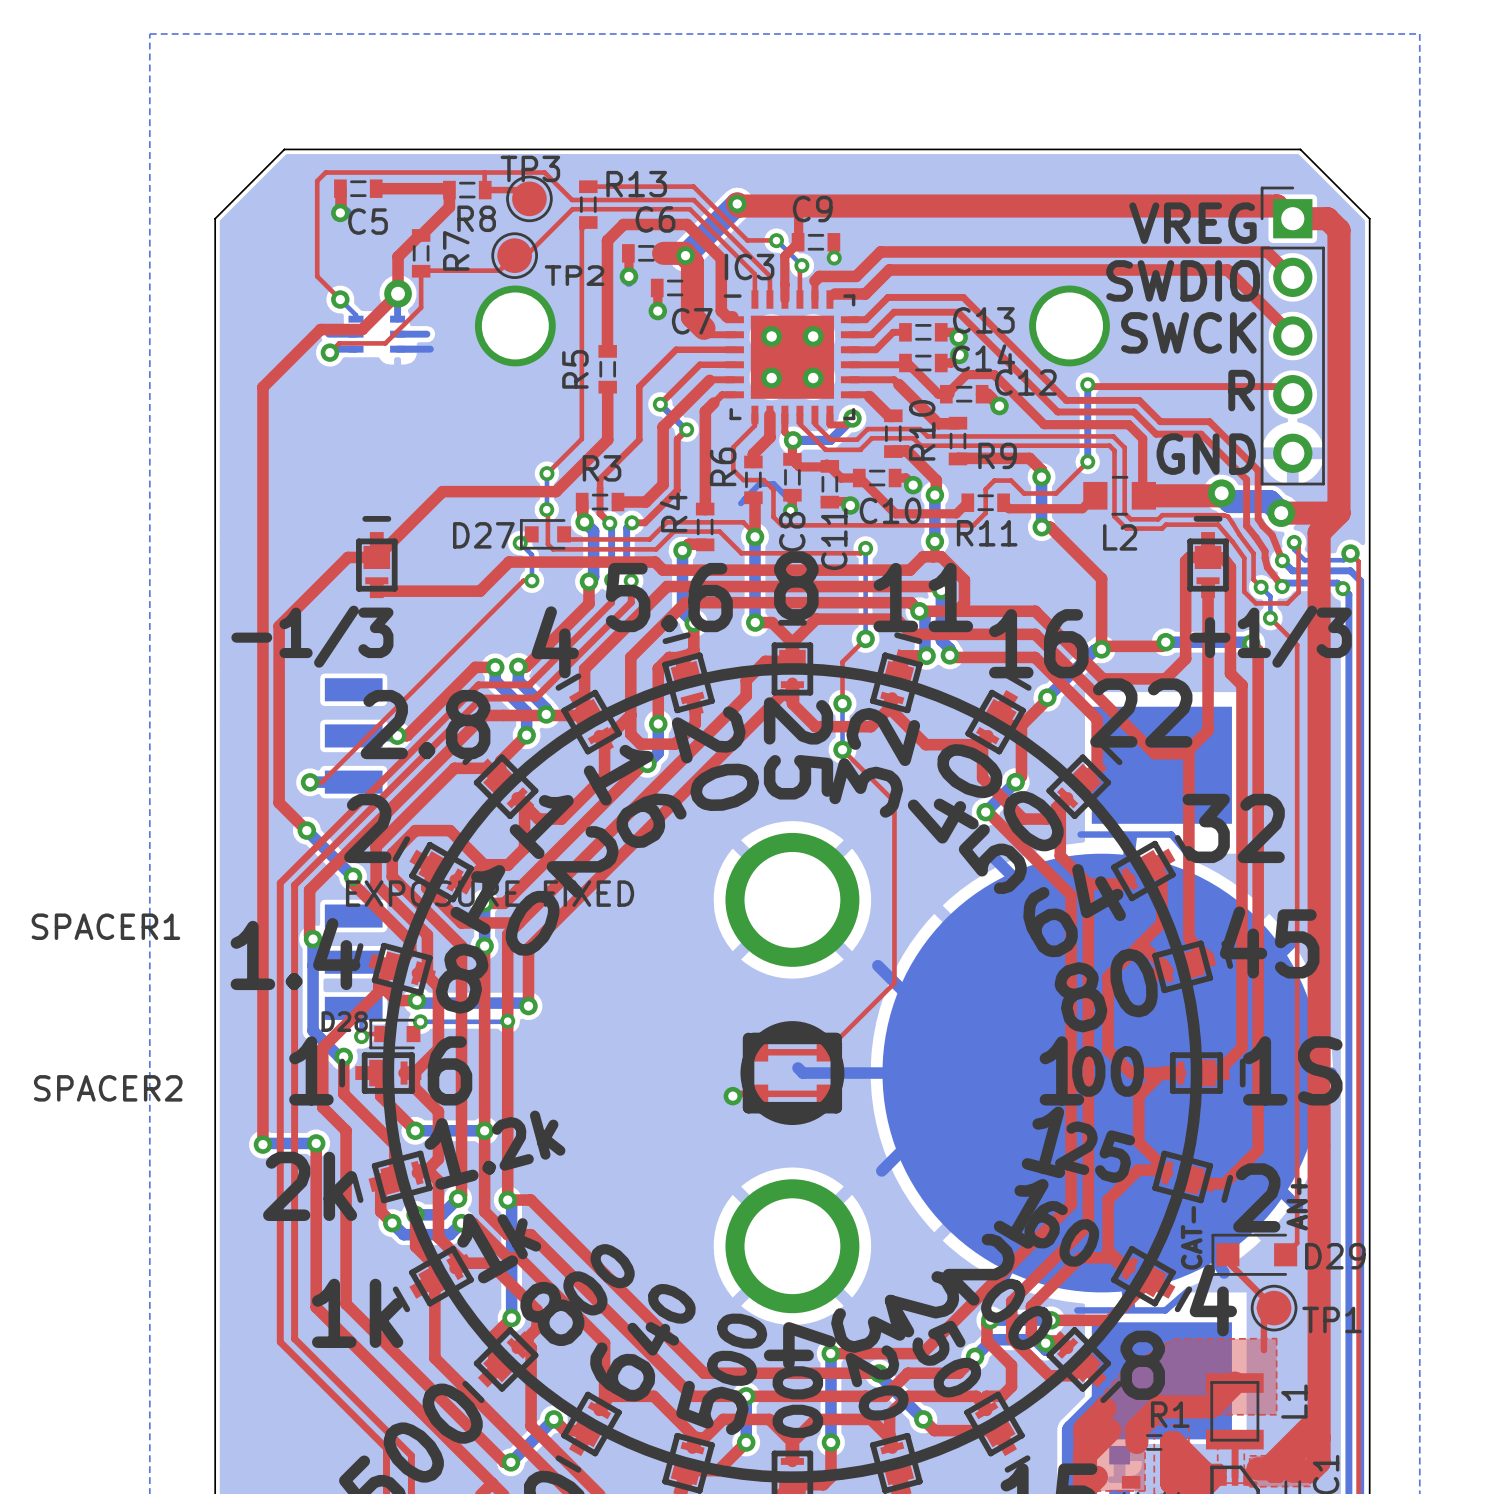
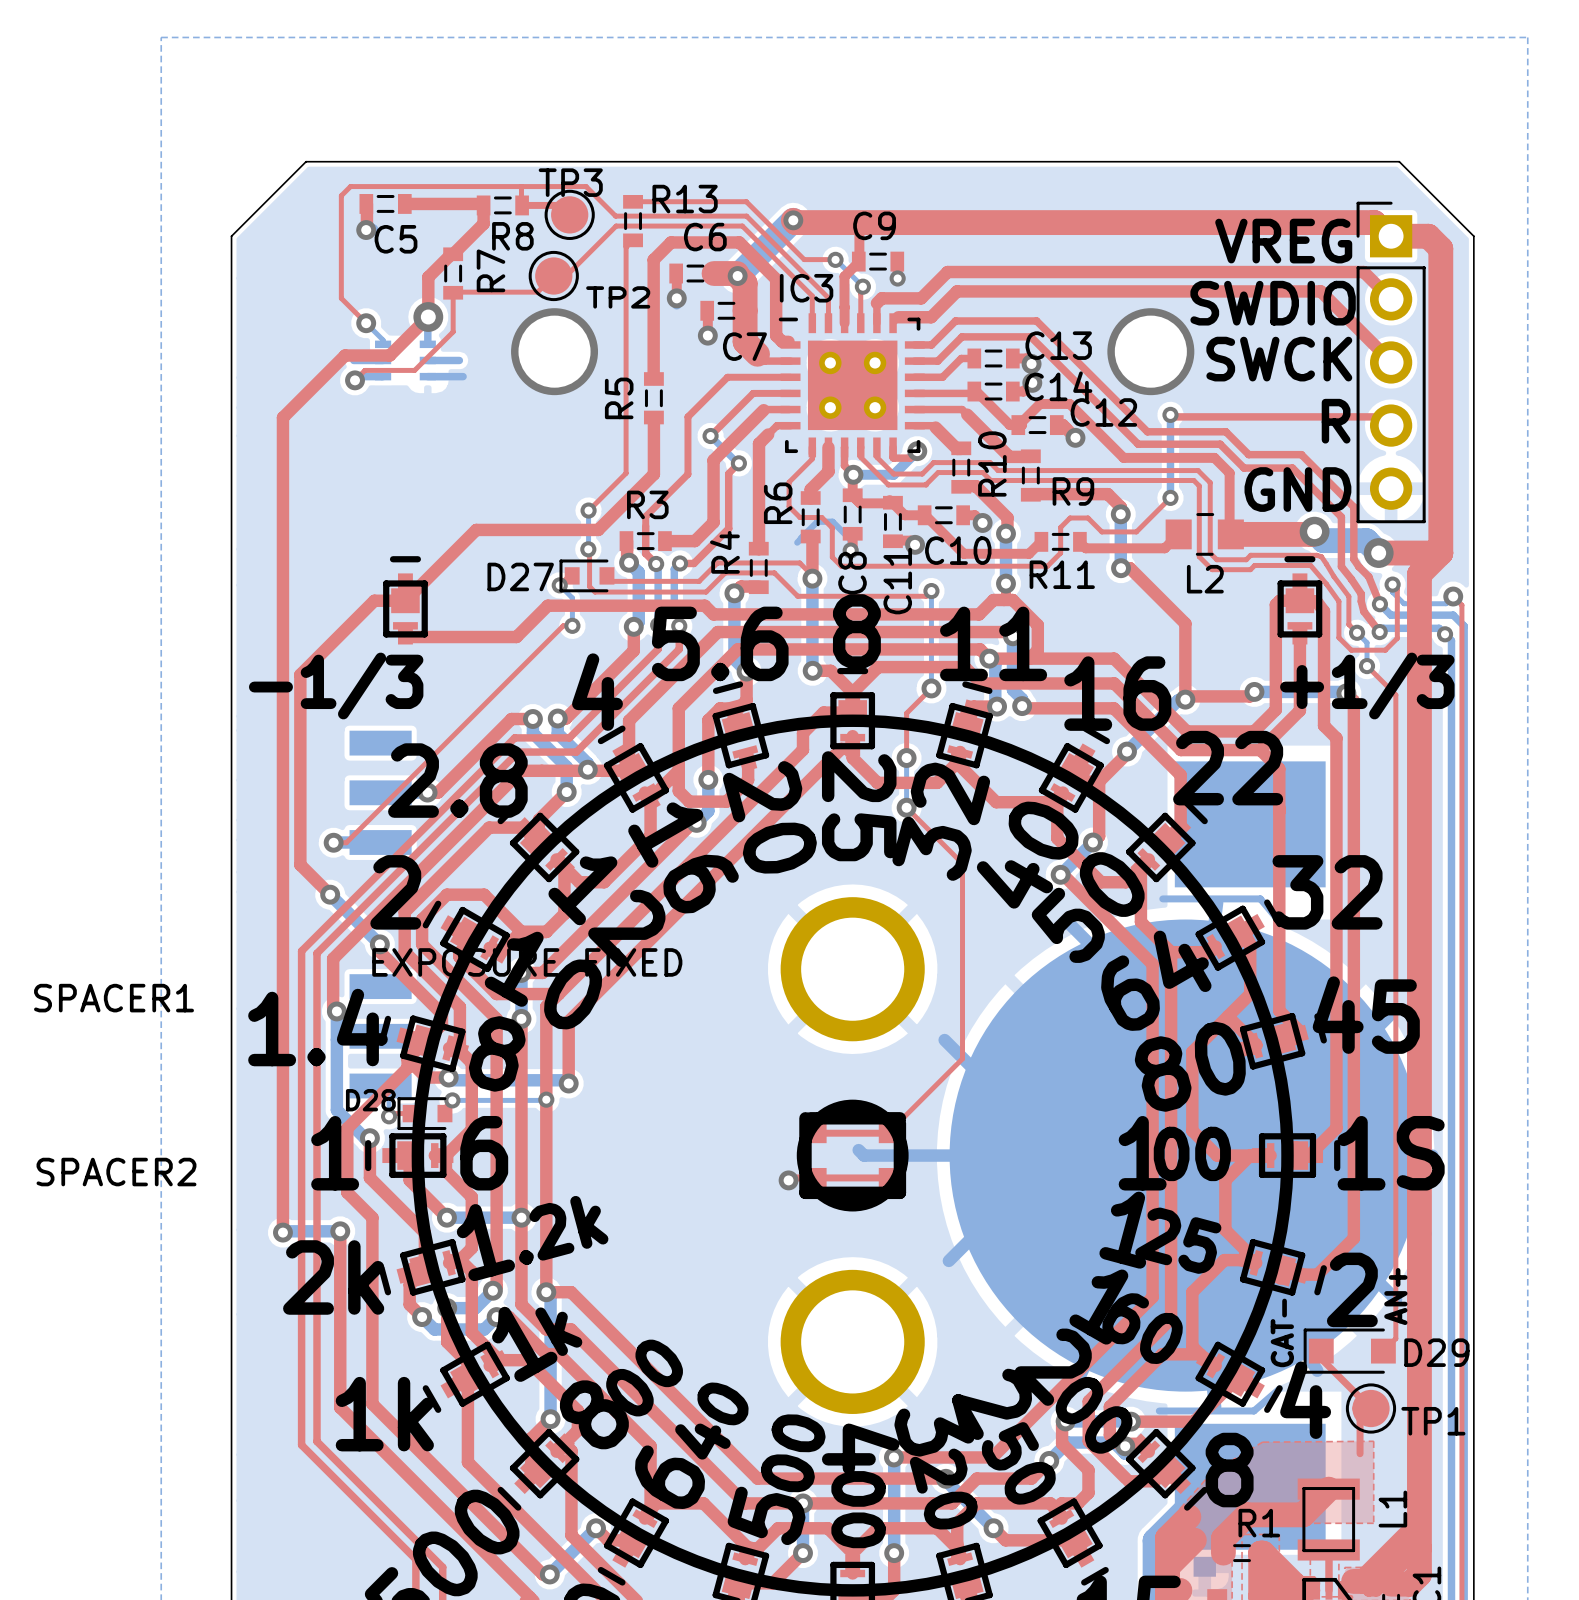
top track: (1035, 634) (1154, 753) (1188, 753) -> (1114, 683) (1180, 750) (1260, 750)
top track: (1208, 659) (1208, 730) (1188, 749) -> (1260, 750) (1279, 768) (1279, 807)
top track: none -> (1299, 710) (1260, 750)

